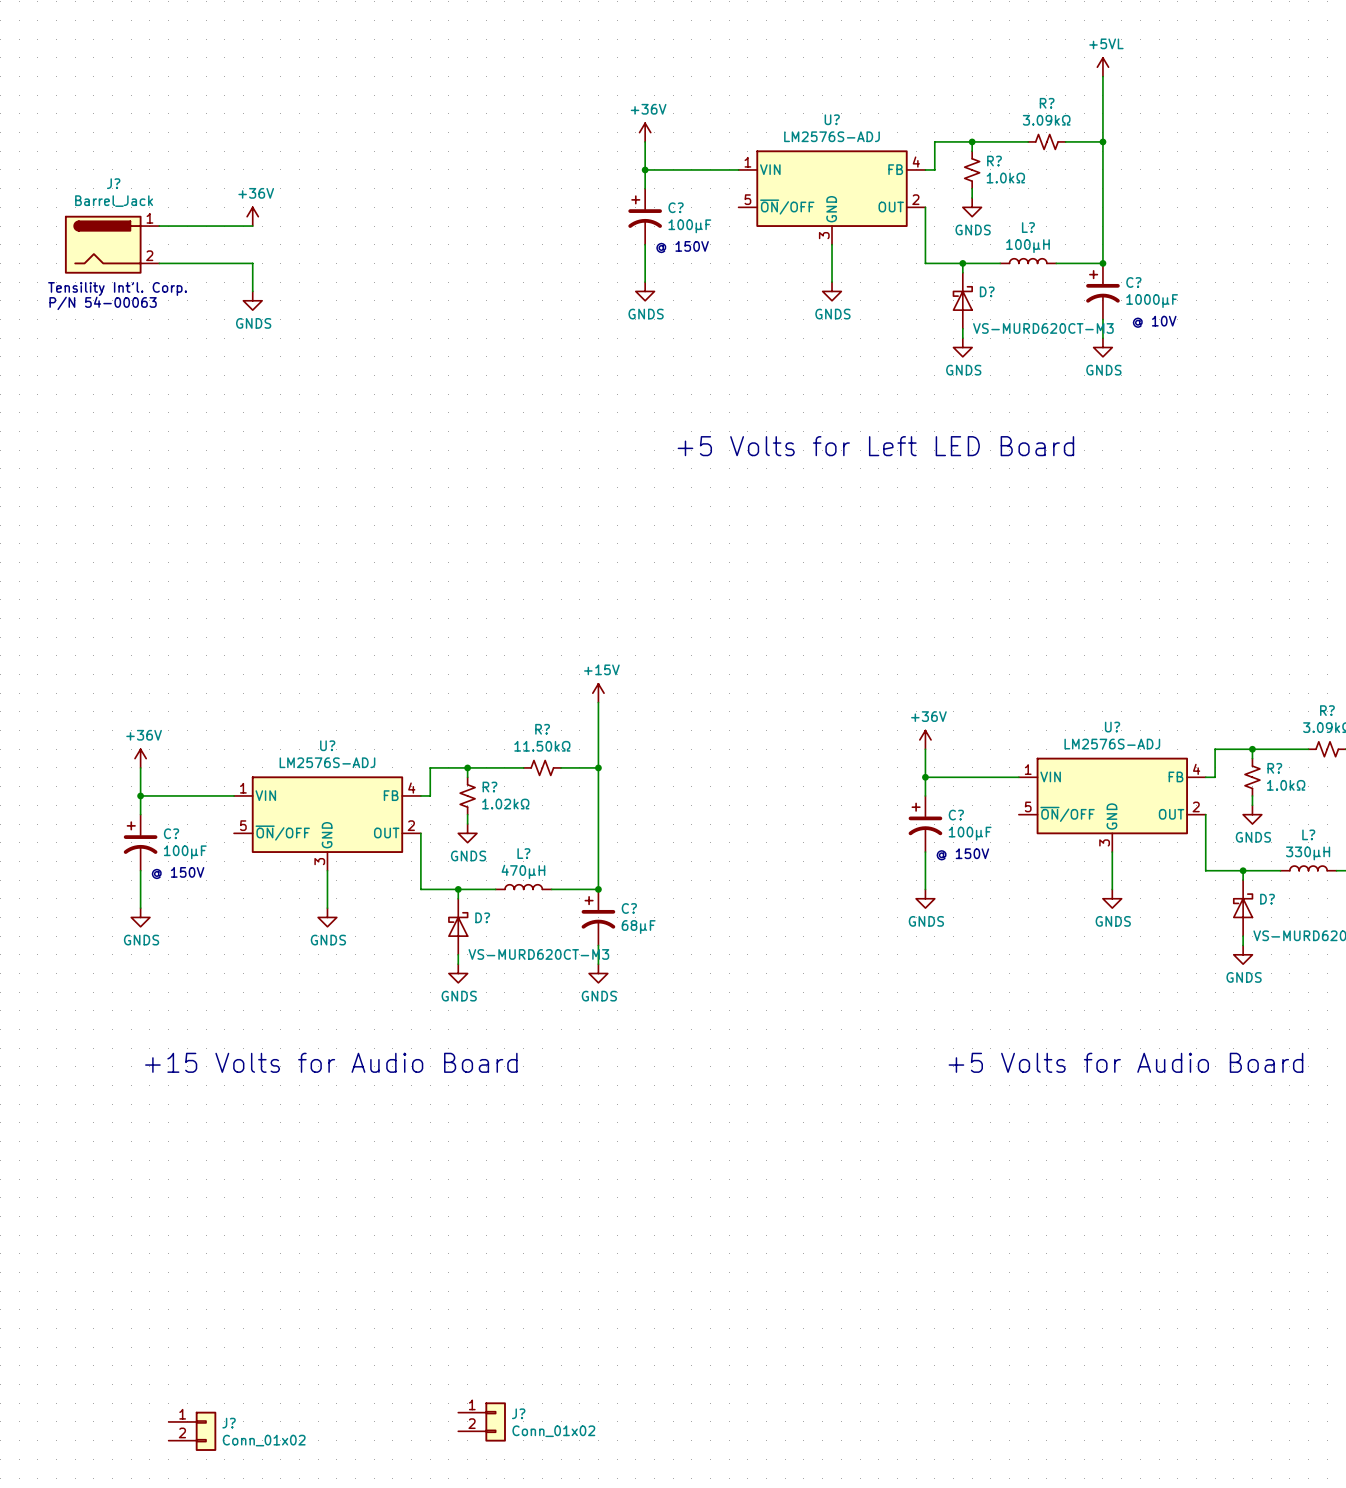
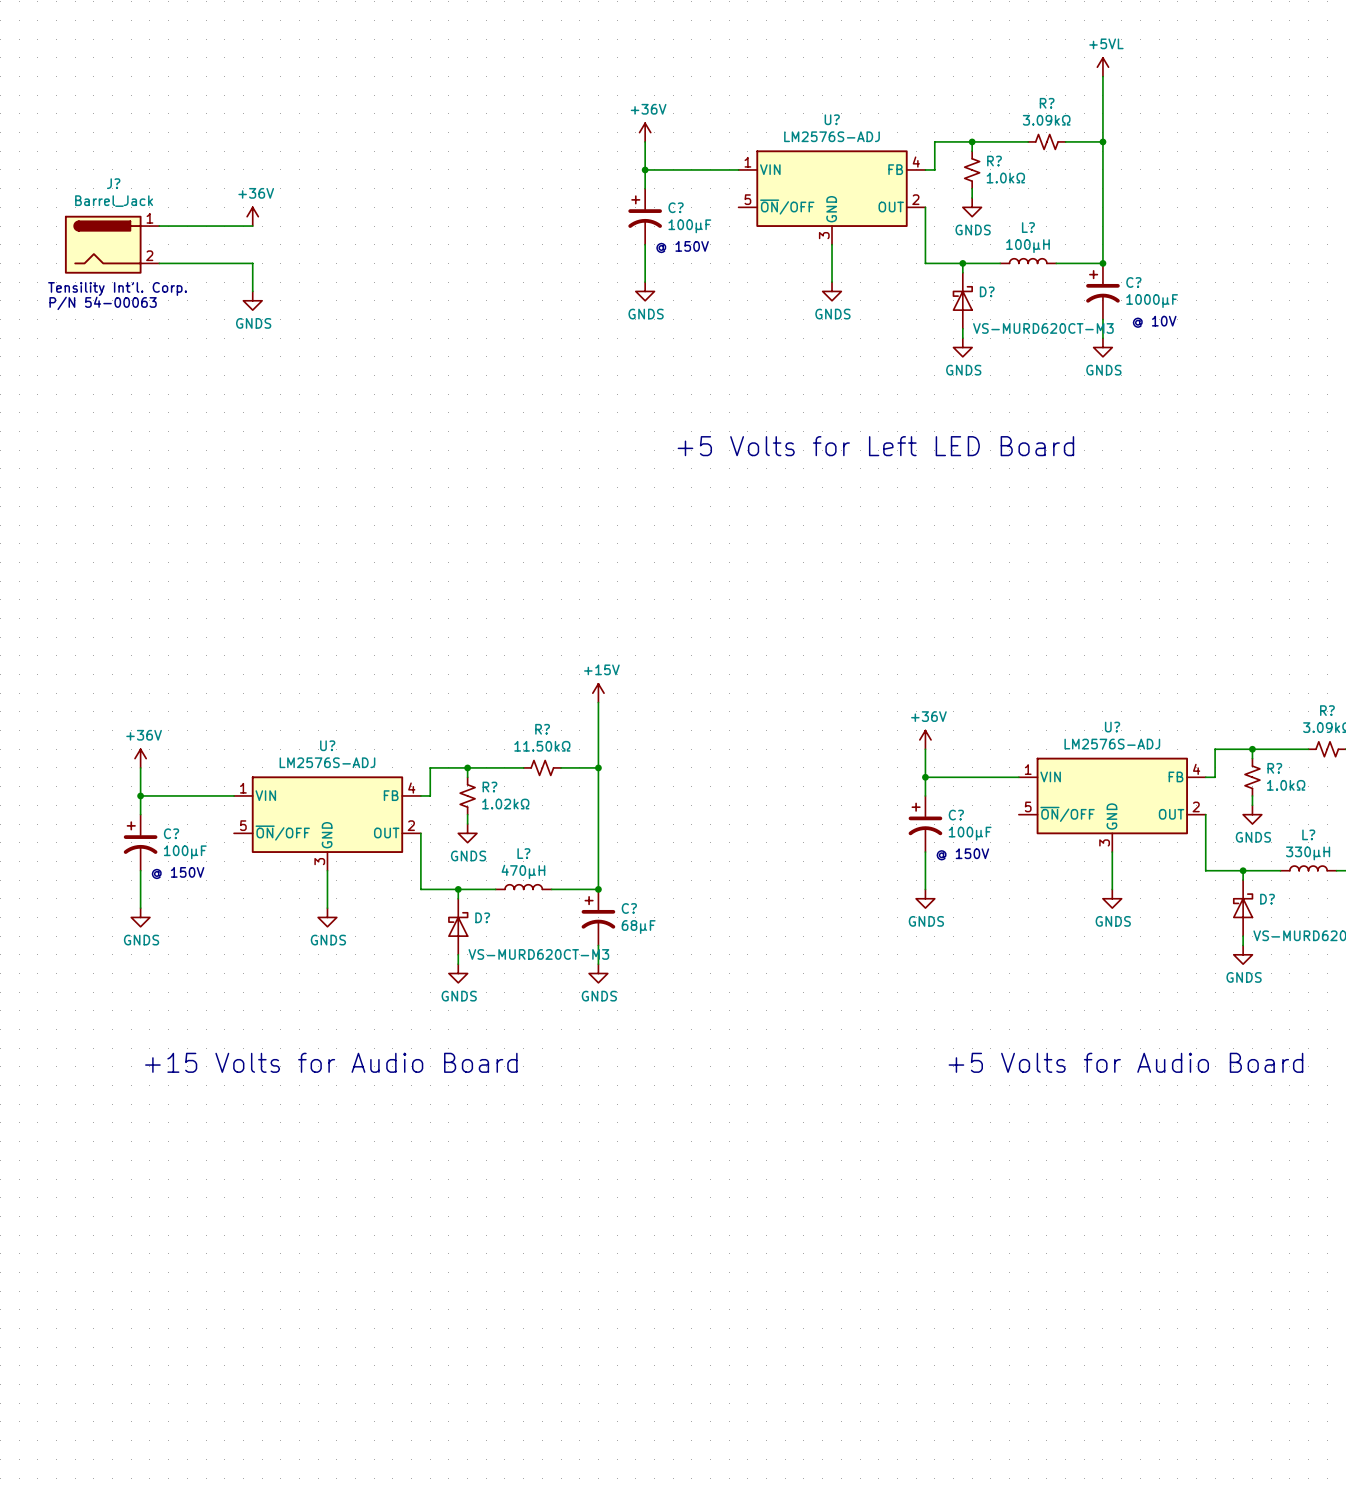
J?: Conn_01x02 (482, 1421) -> none
J?: Conn_01x02 (192, 1431) -> none

